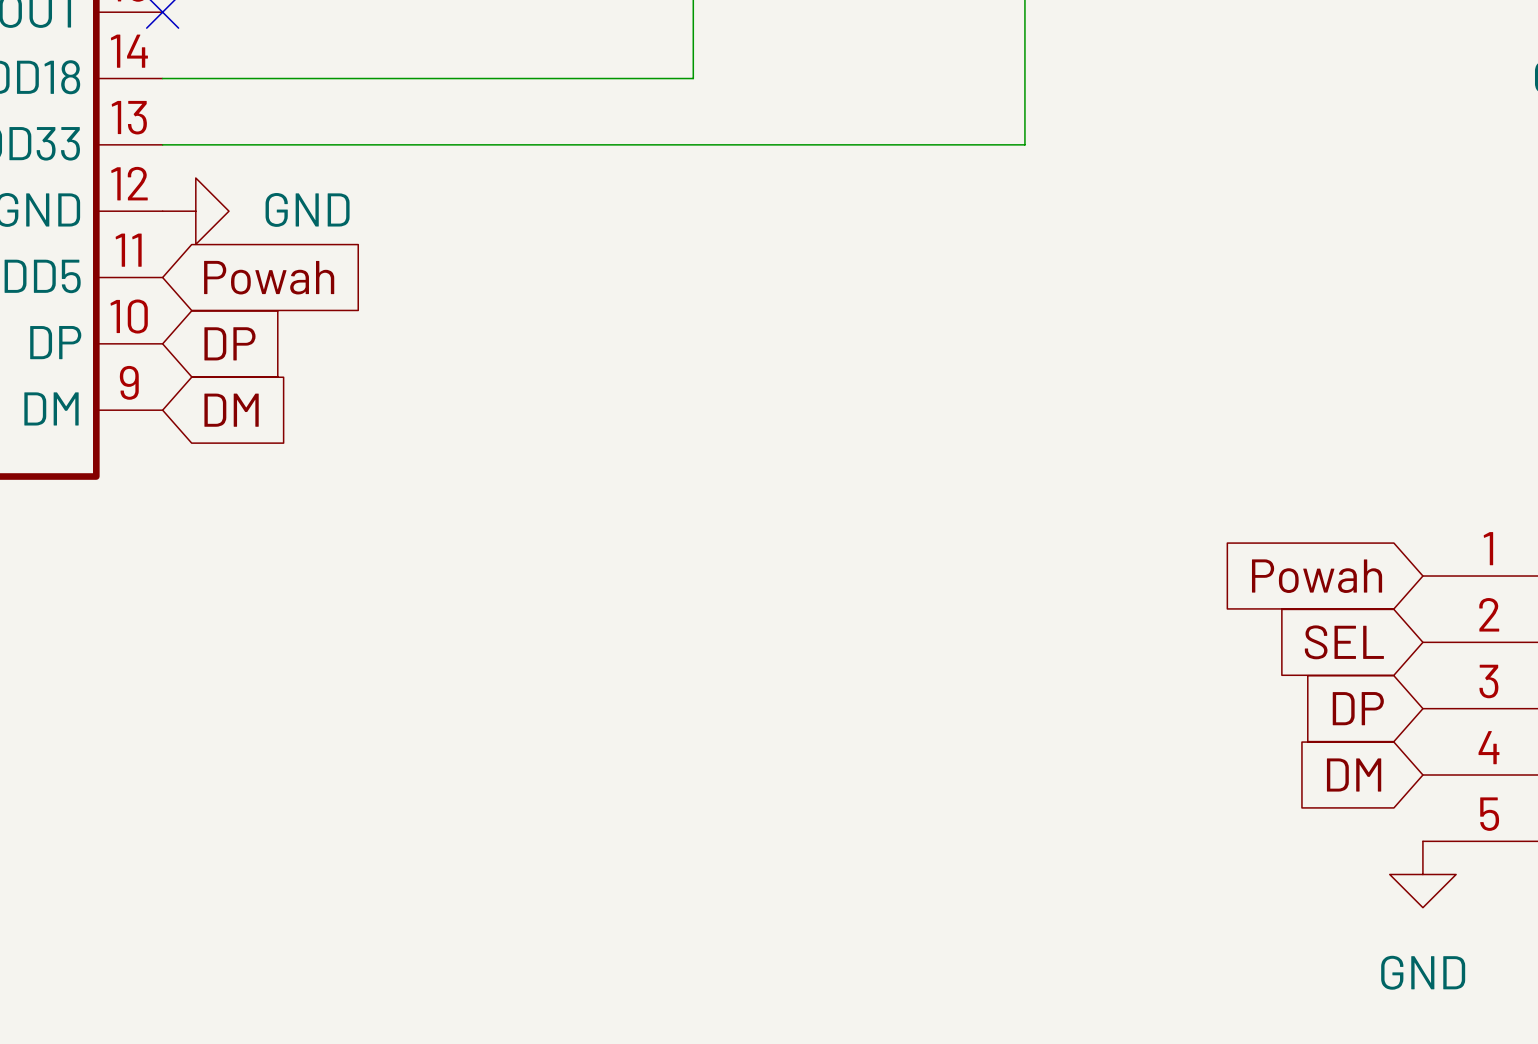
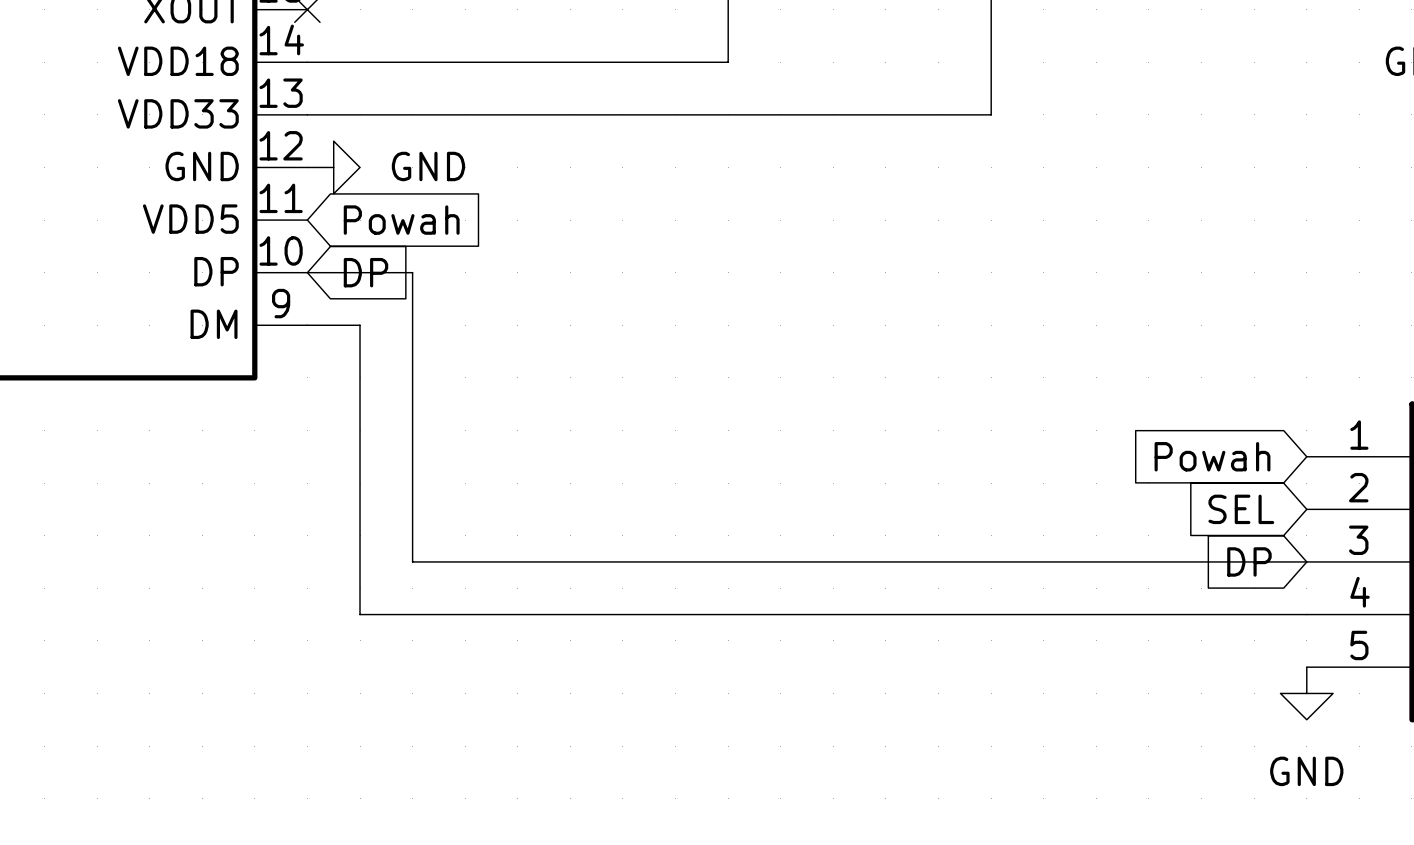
wire: none -> (307, 272) (412, 272) (412, 561) (1306, 561)
wire: none -> (307, 325) (360, 325) (360, 614) (1306, 614)
global label: DM (231, 410) -> none
global label: DM (1354, 775) -> none

